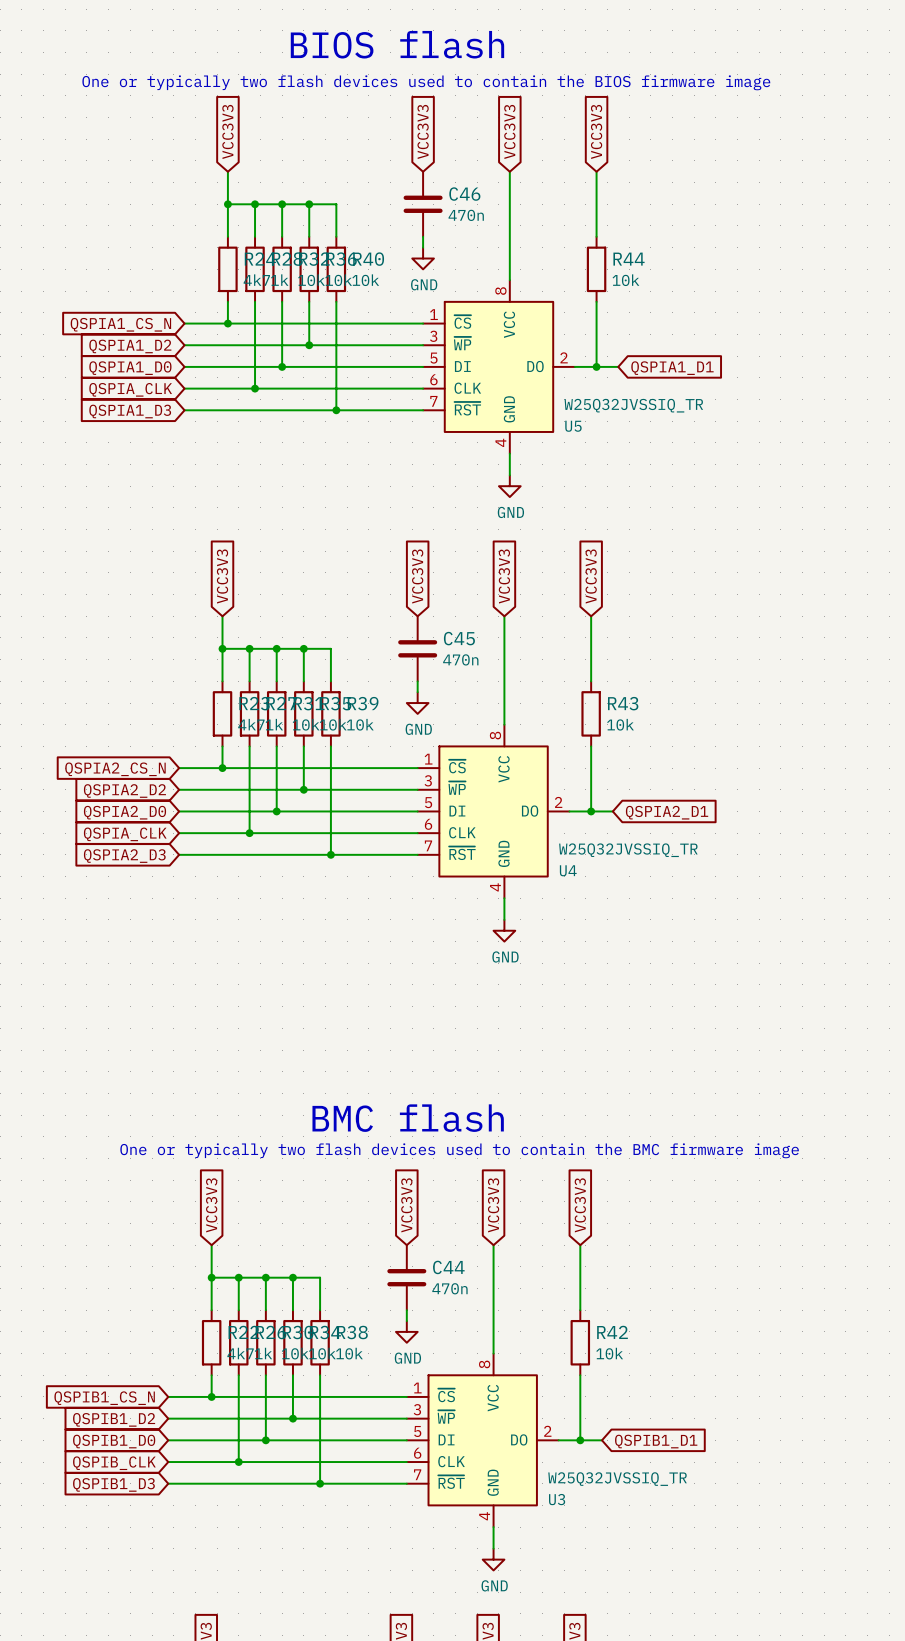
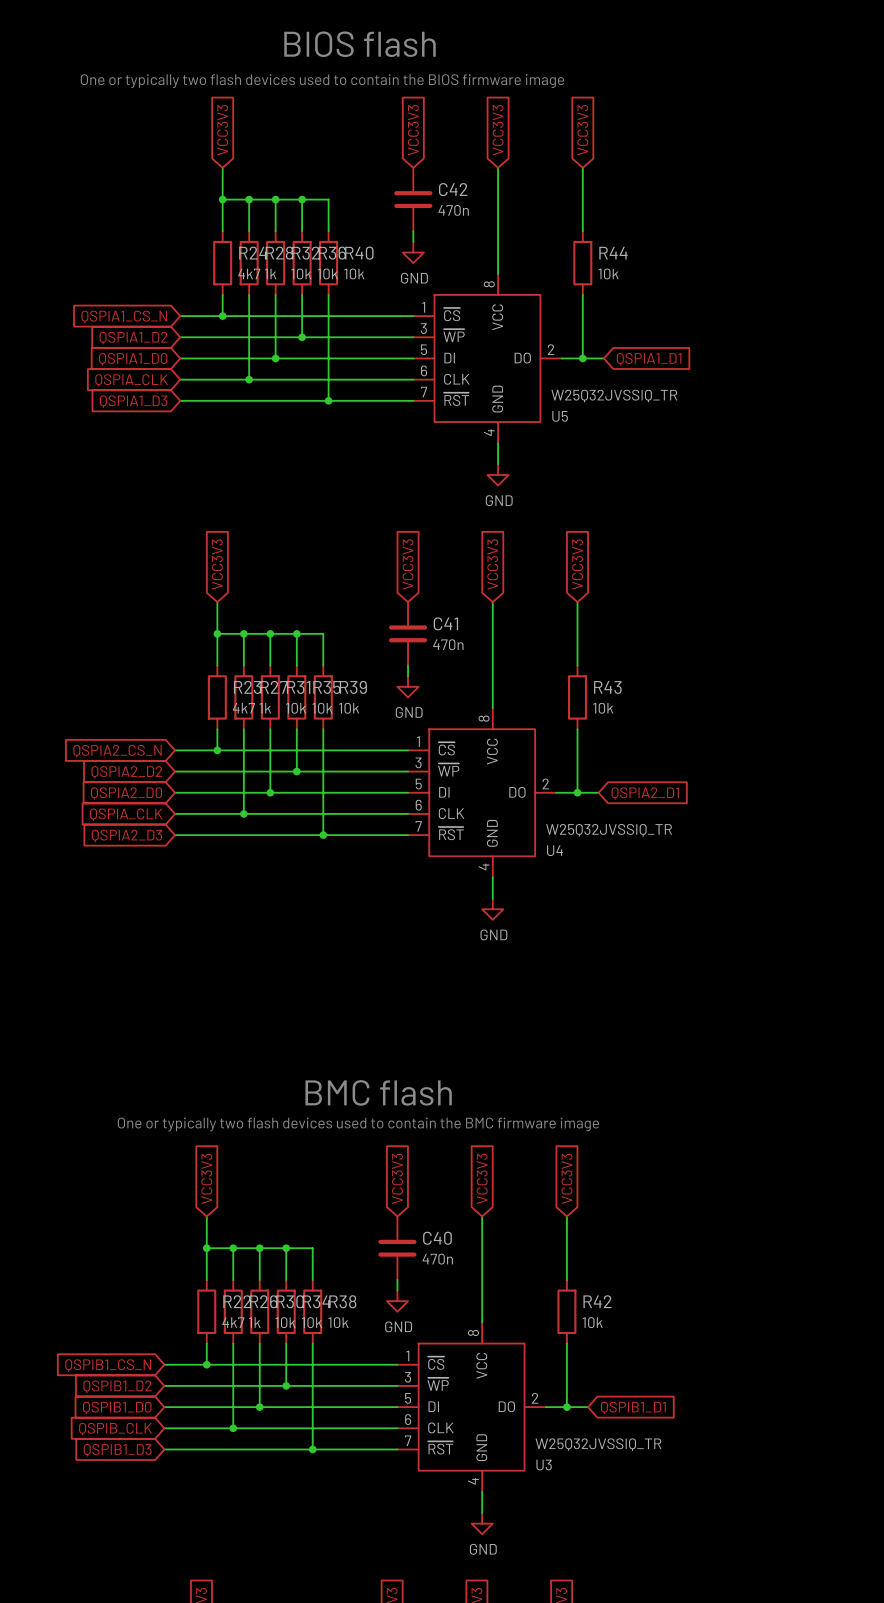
C46 name: C46 (464, 194) -> C42 (453, 189)
C45 name: C45 (459, 638) -> C41 (445, 623)
C44 name: C44 (448, 1267) -> C40 (437, 1238)

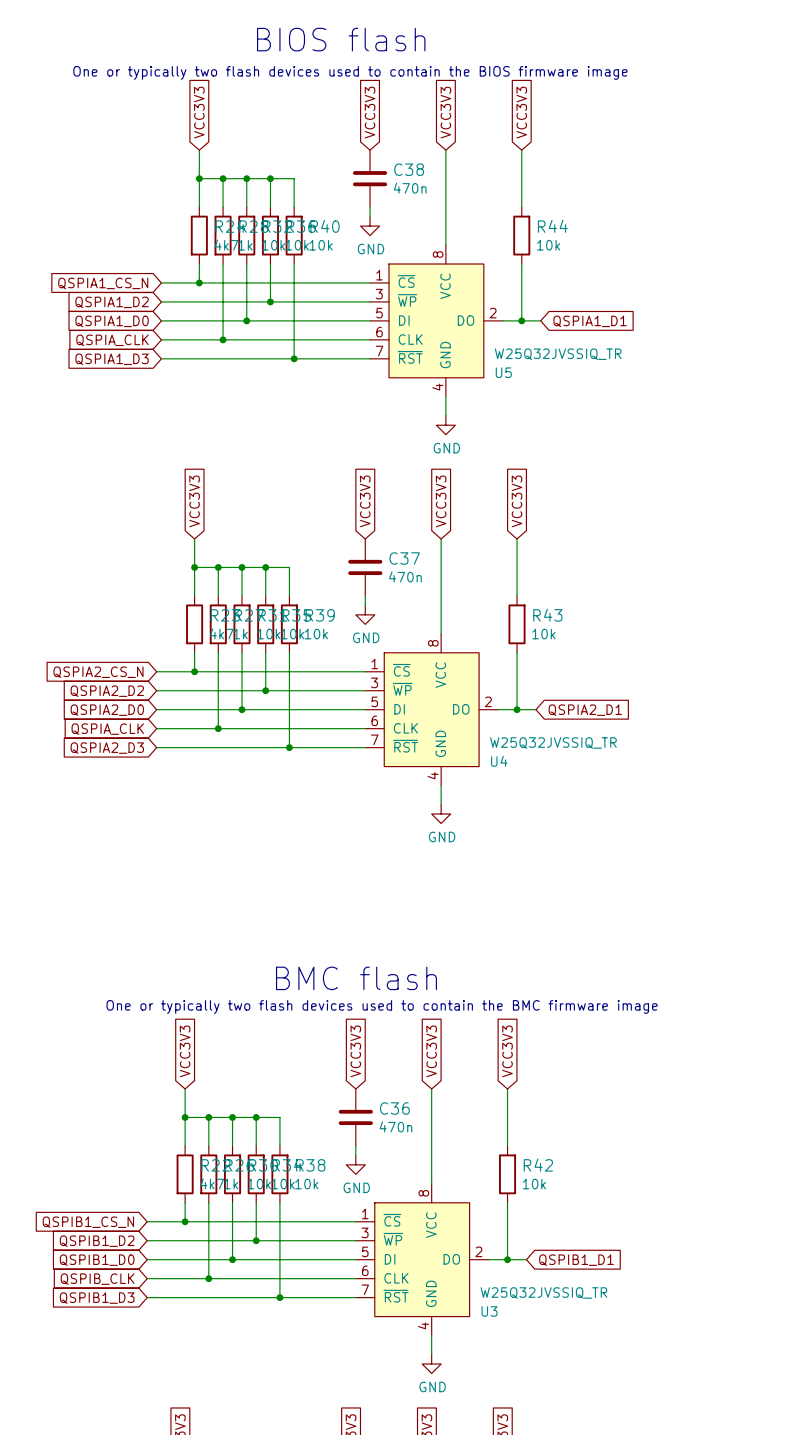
C42 name: C42 (453, 189) -> C38 (409, 169)
C41 name: C41 (445, 623) -> C37 (404, 558)
C40 name: C40 (437, 1238) -> C36 (394, 1108)

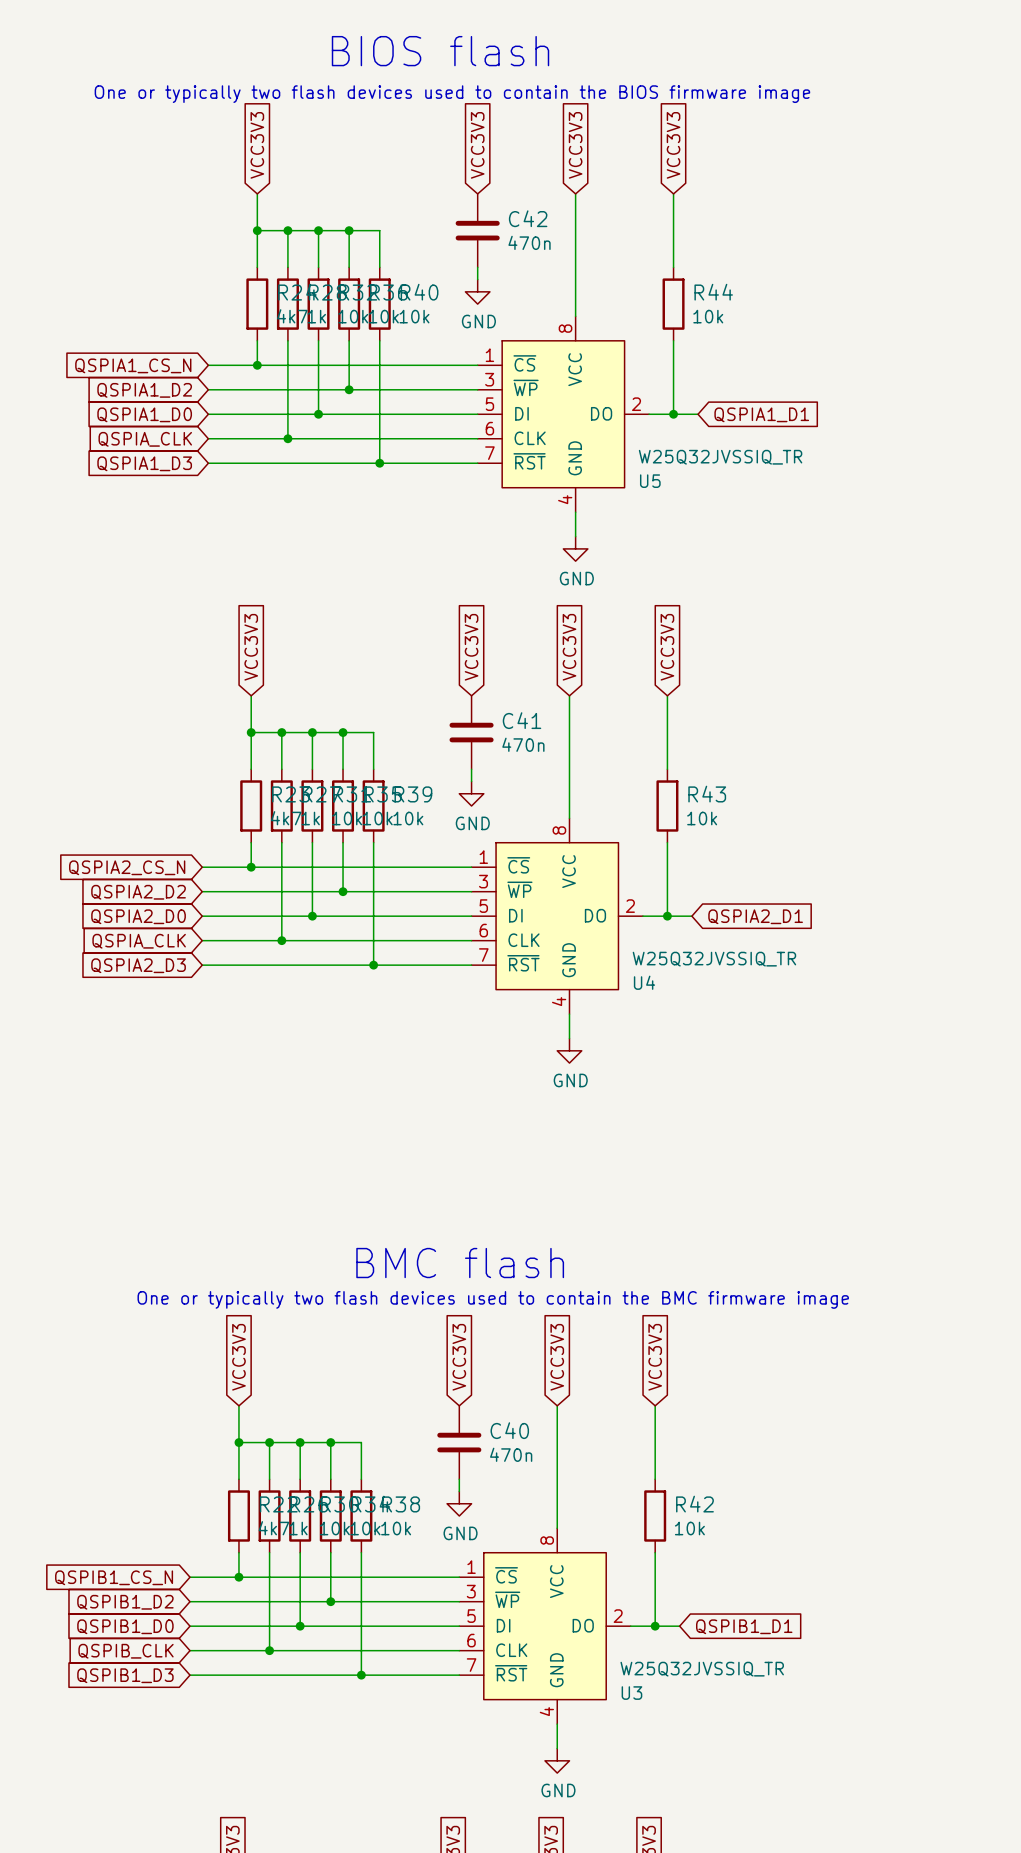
C38 name: C38 (409, 169) -> C42 (528, 218)
C37 name: C37 (404, 558) -> C41 (522, 720)
C36 name: C36 (394, 1108) -> C40 (509, 1430)

